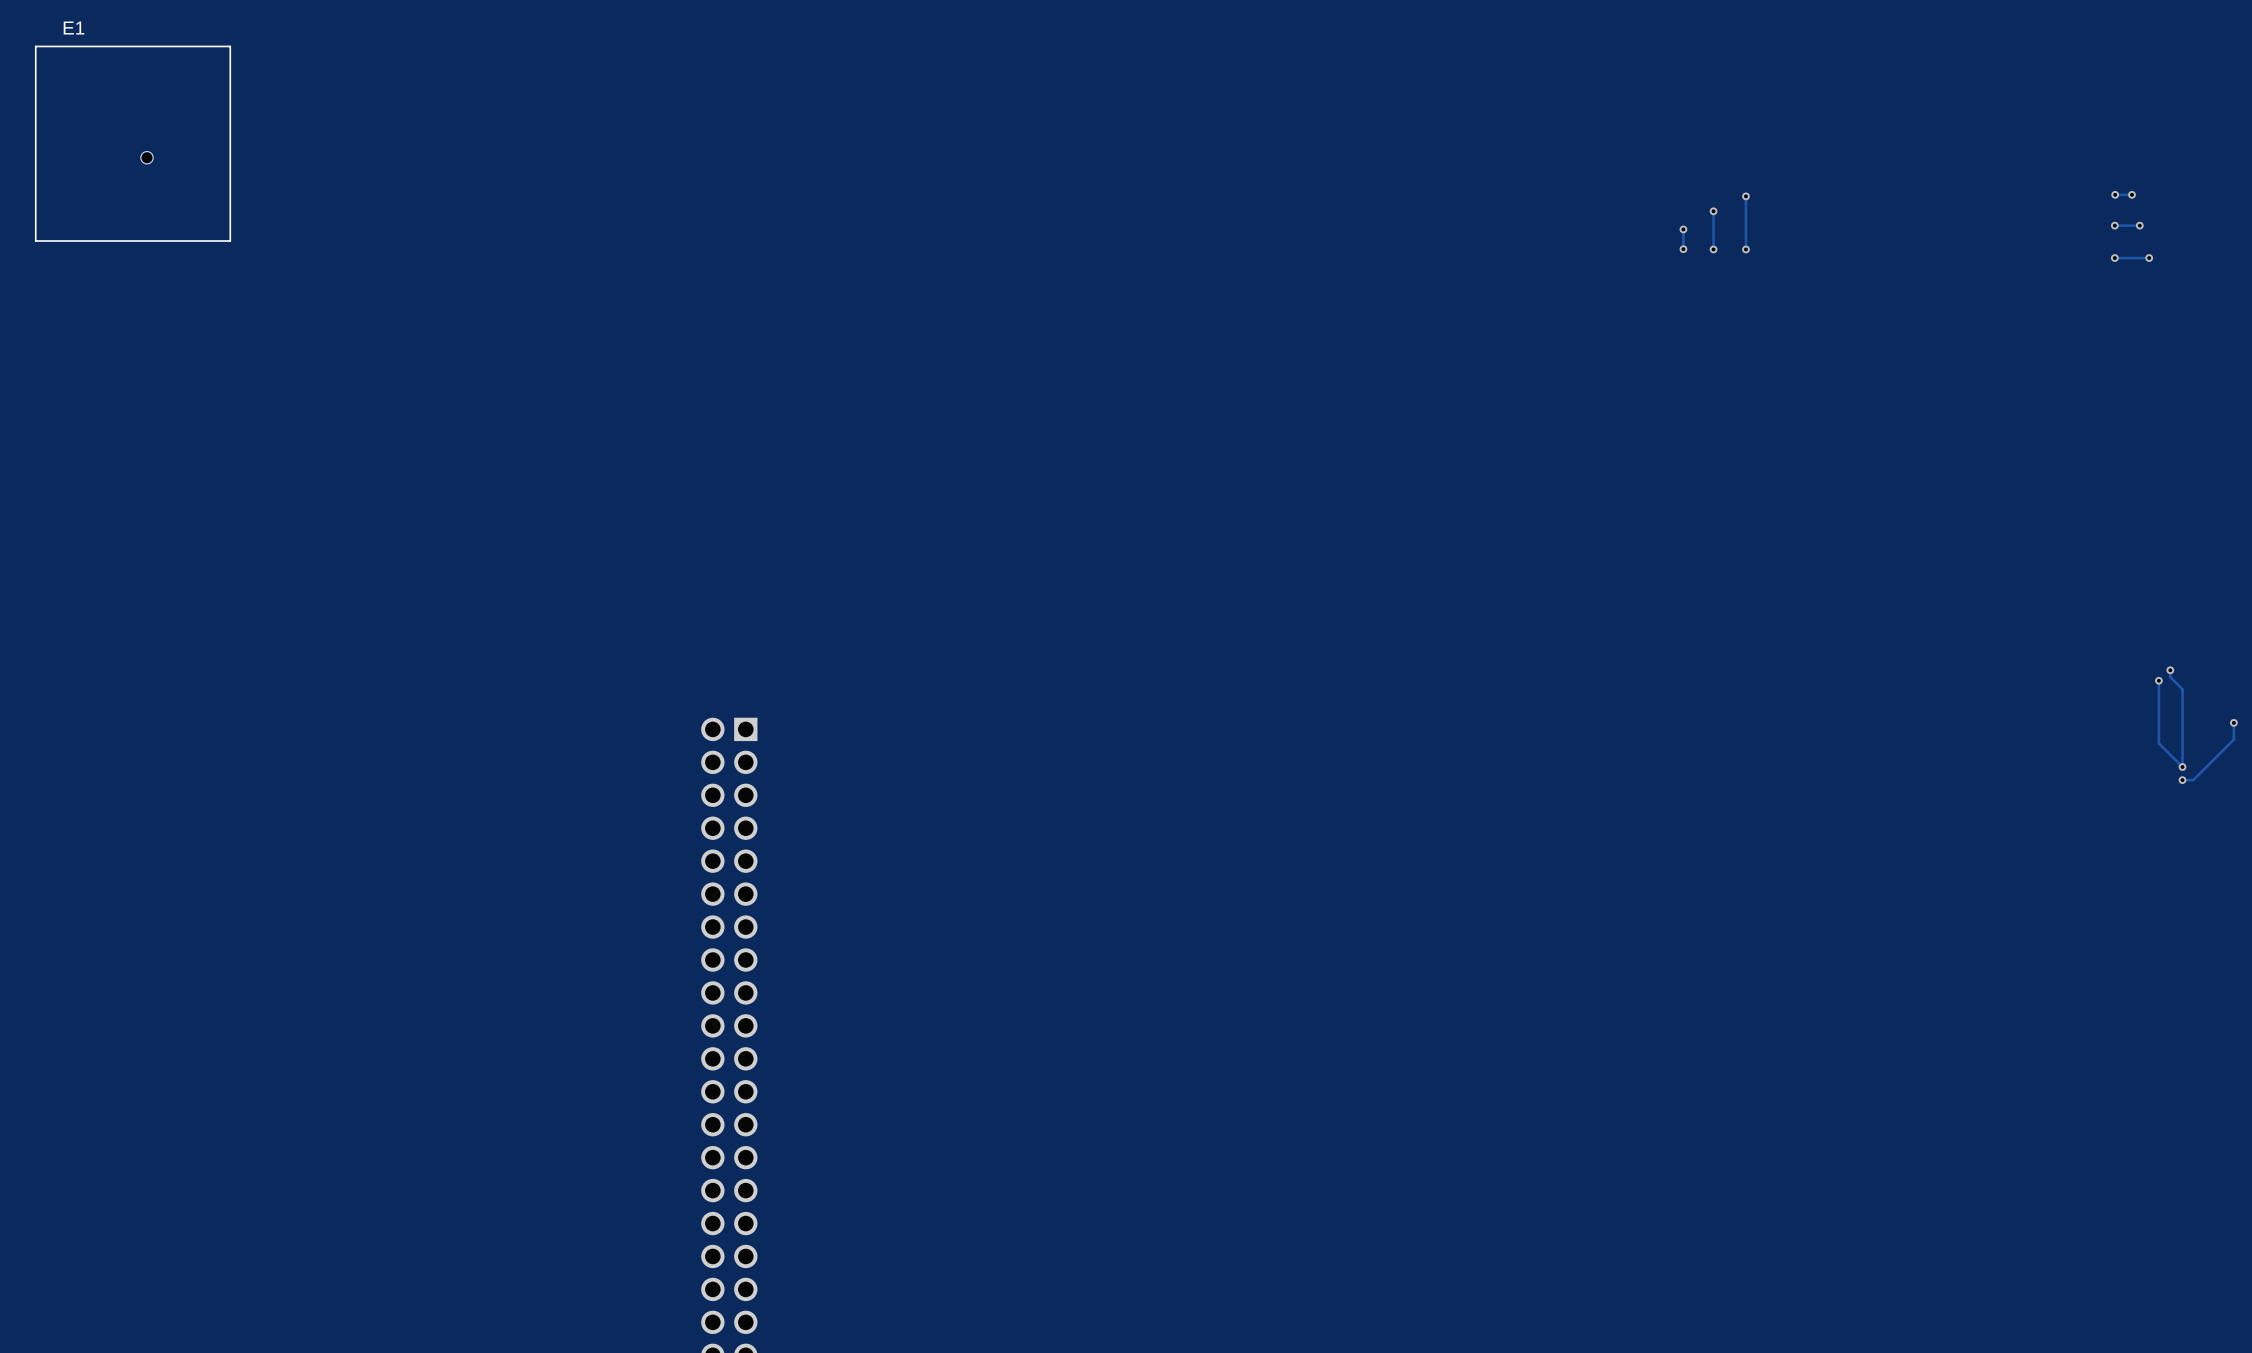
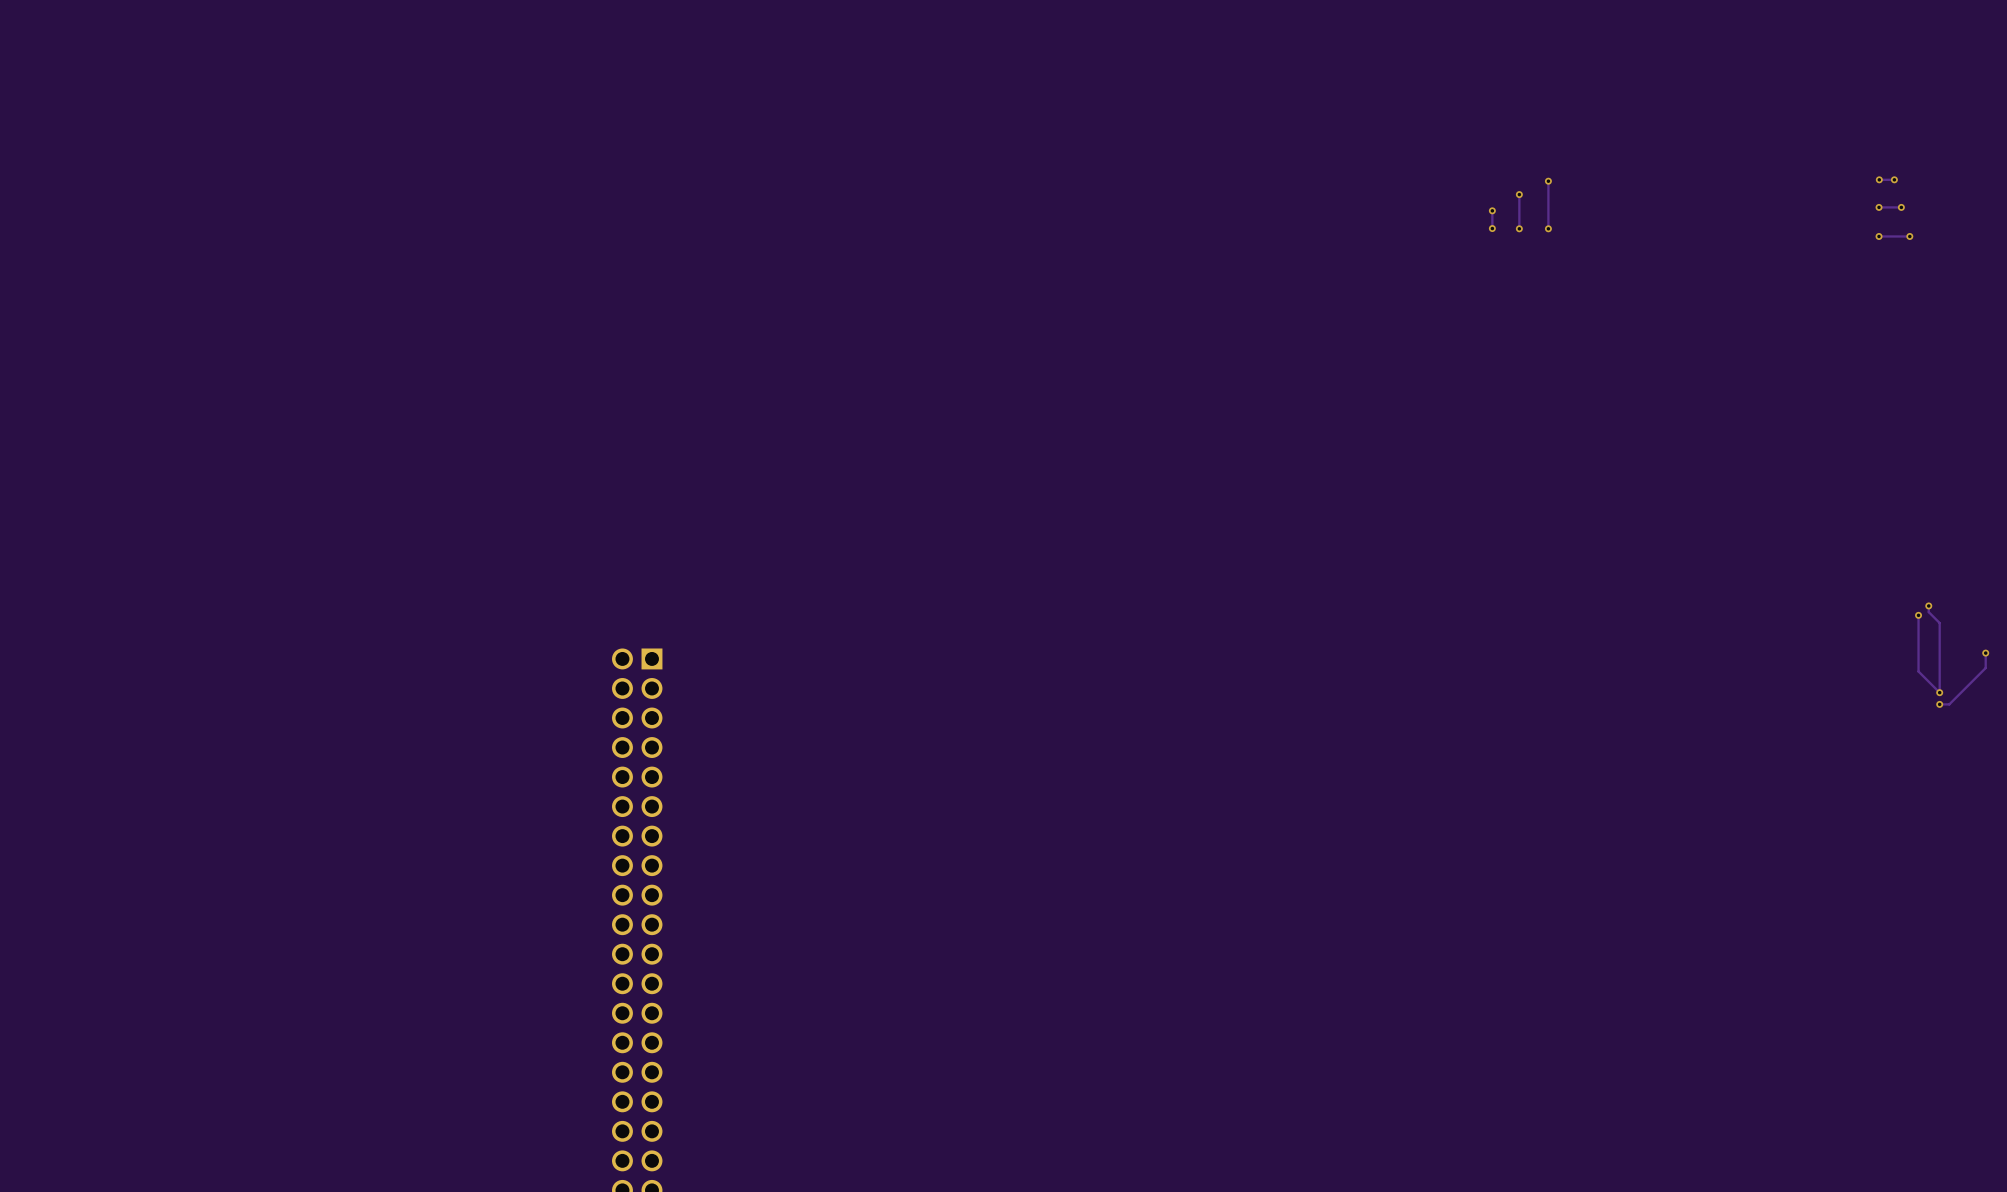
E1: (133, 143) -> none

